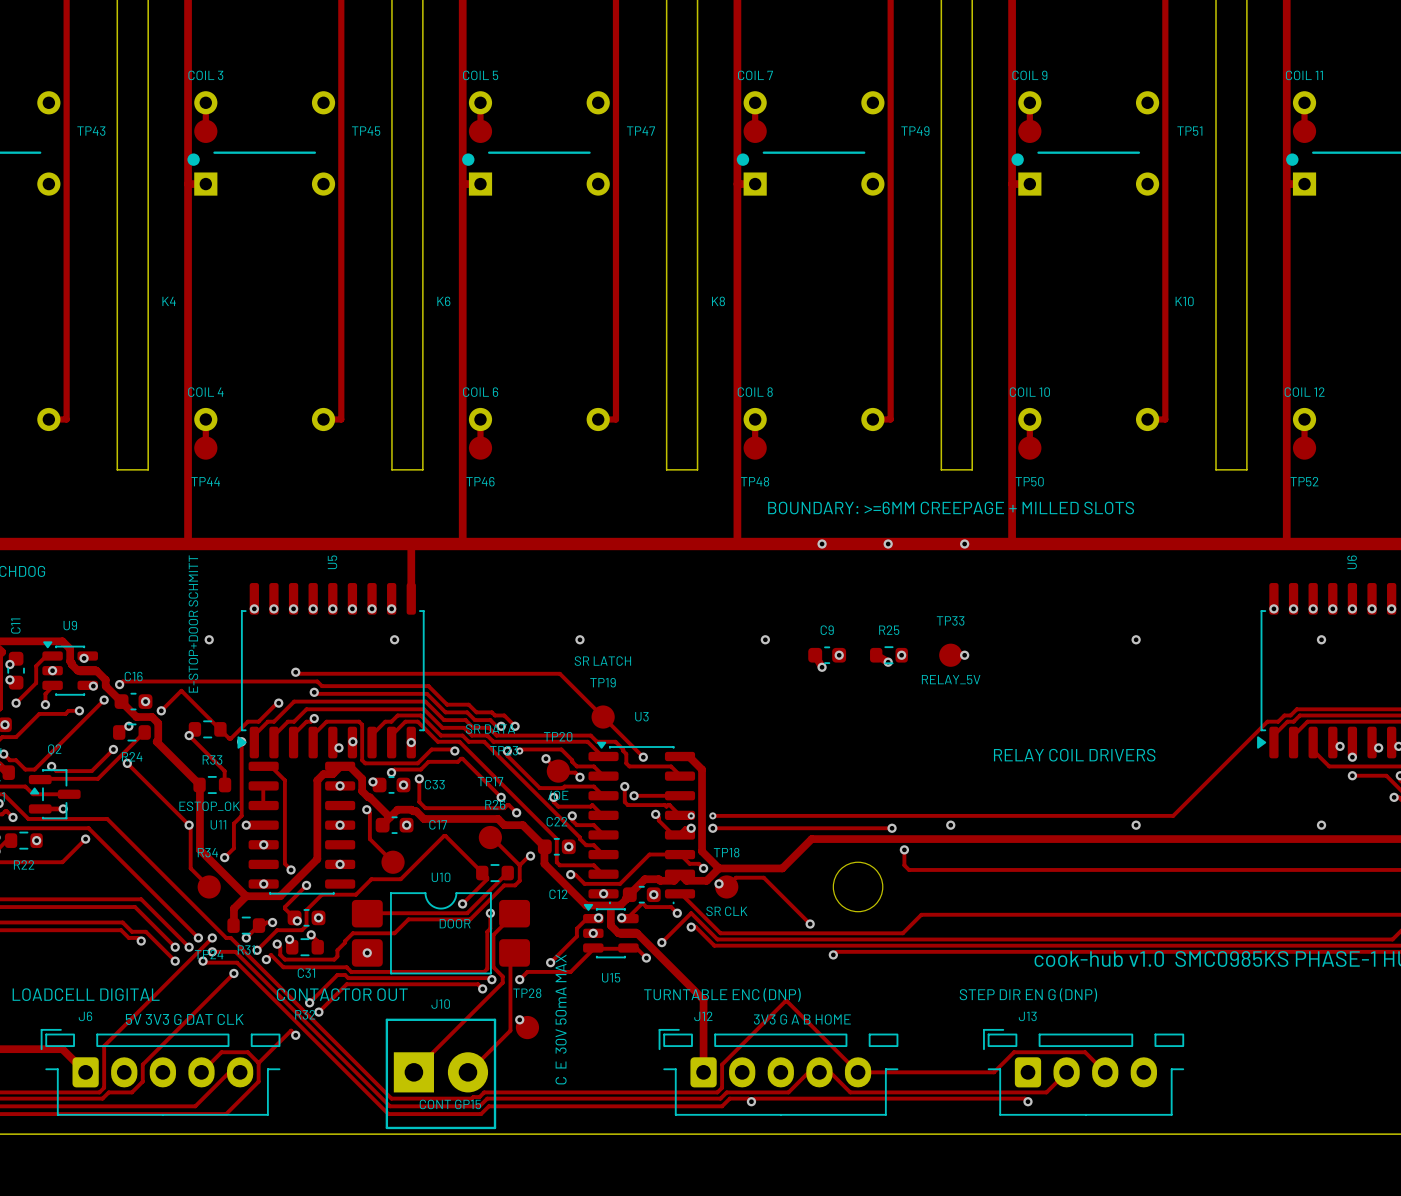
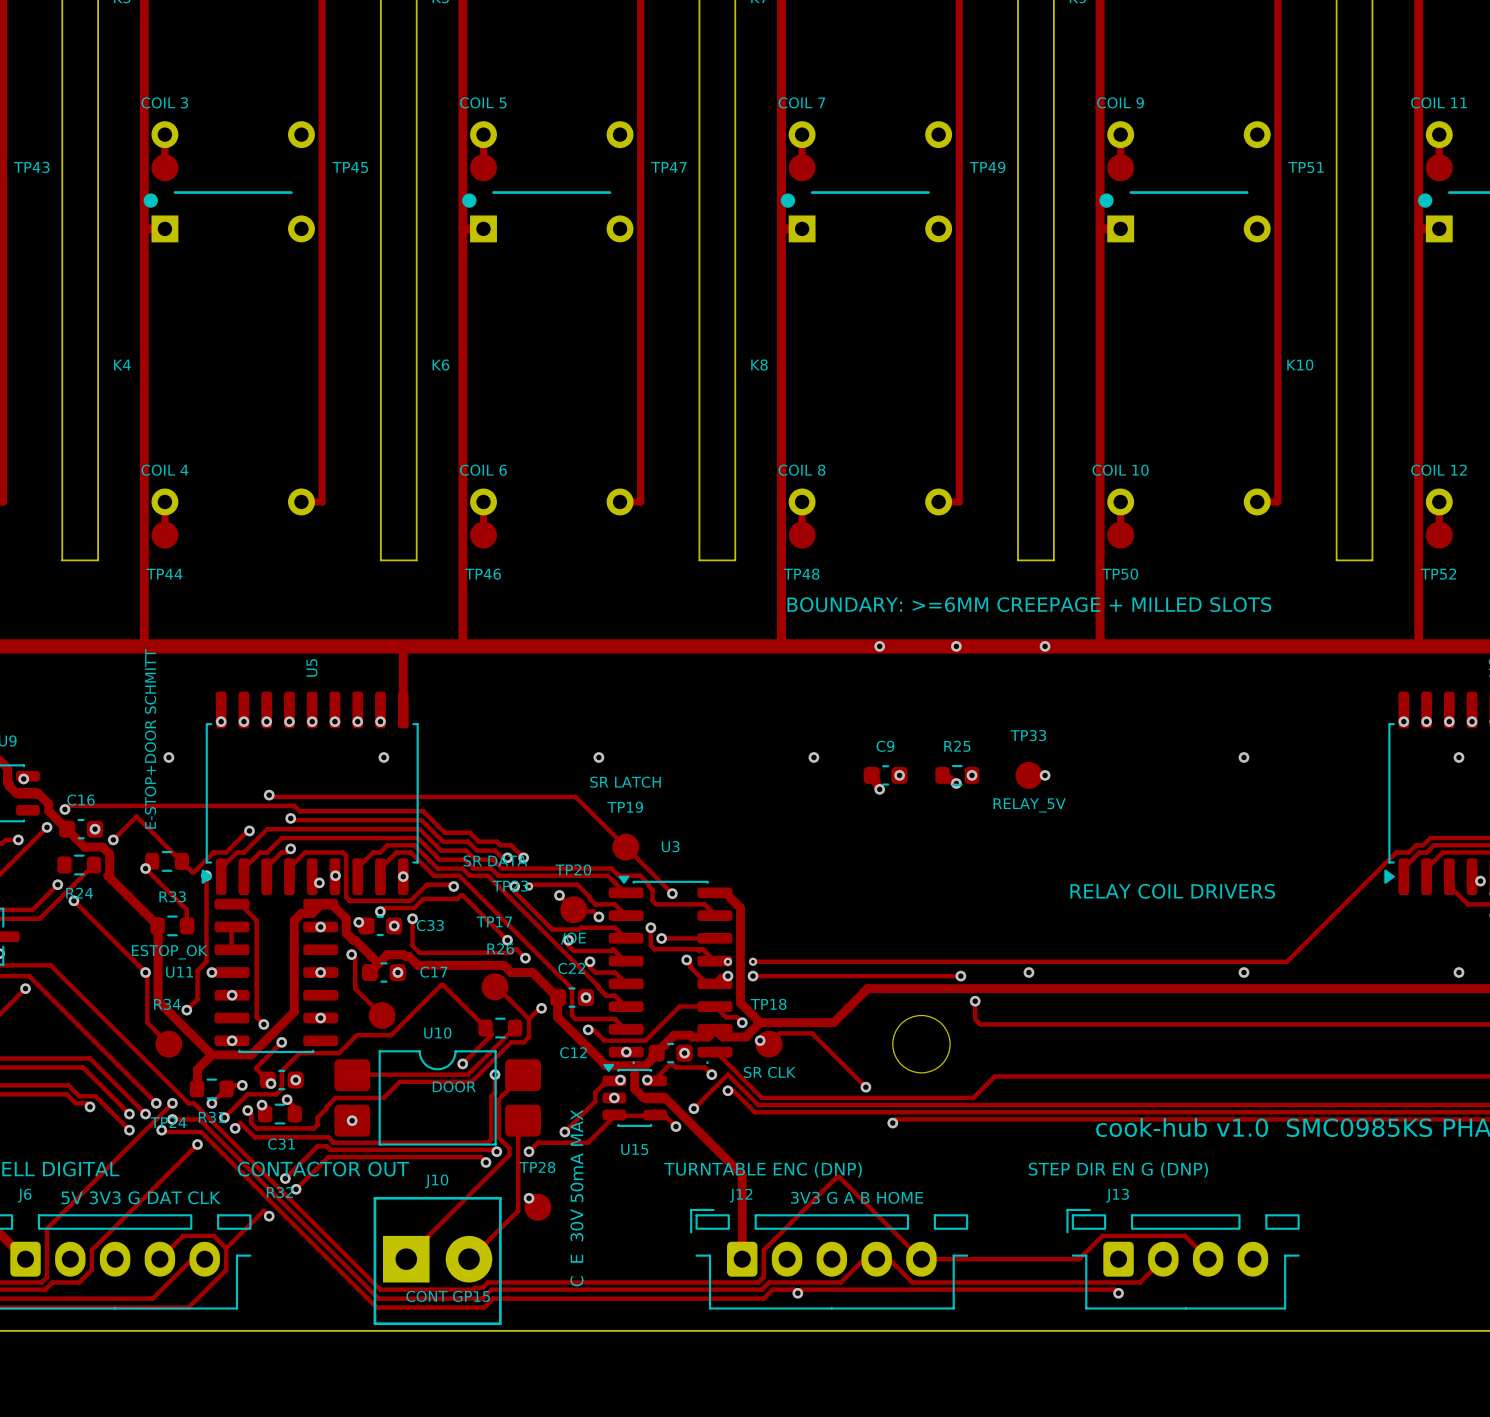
via: (93, 686) -> none
via: (128, 726) -> none

